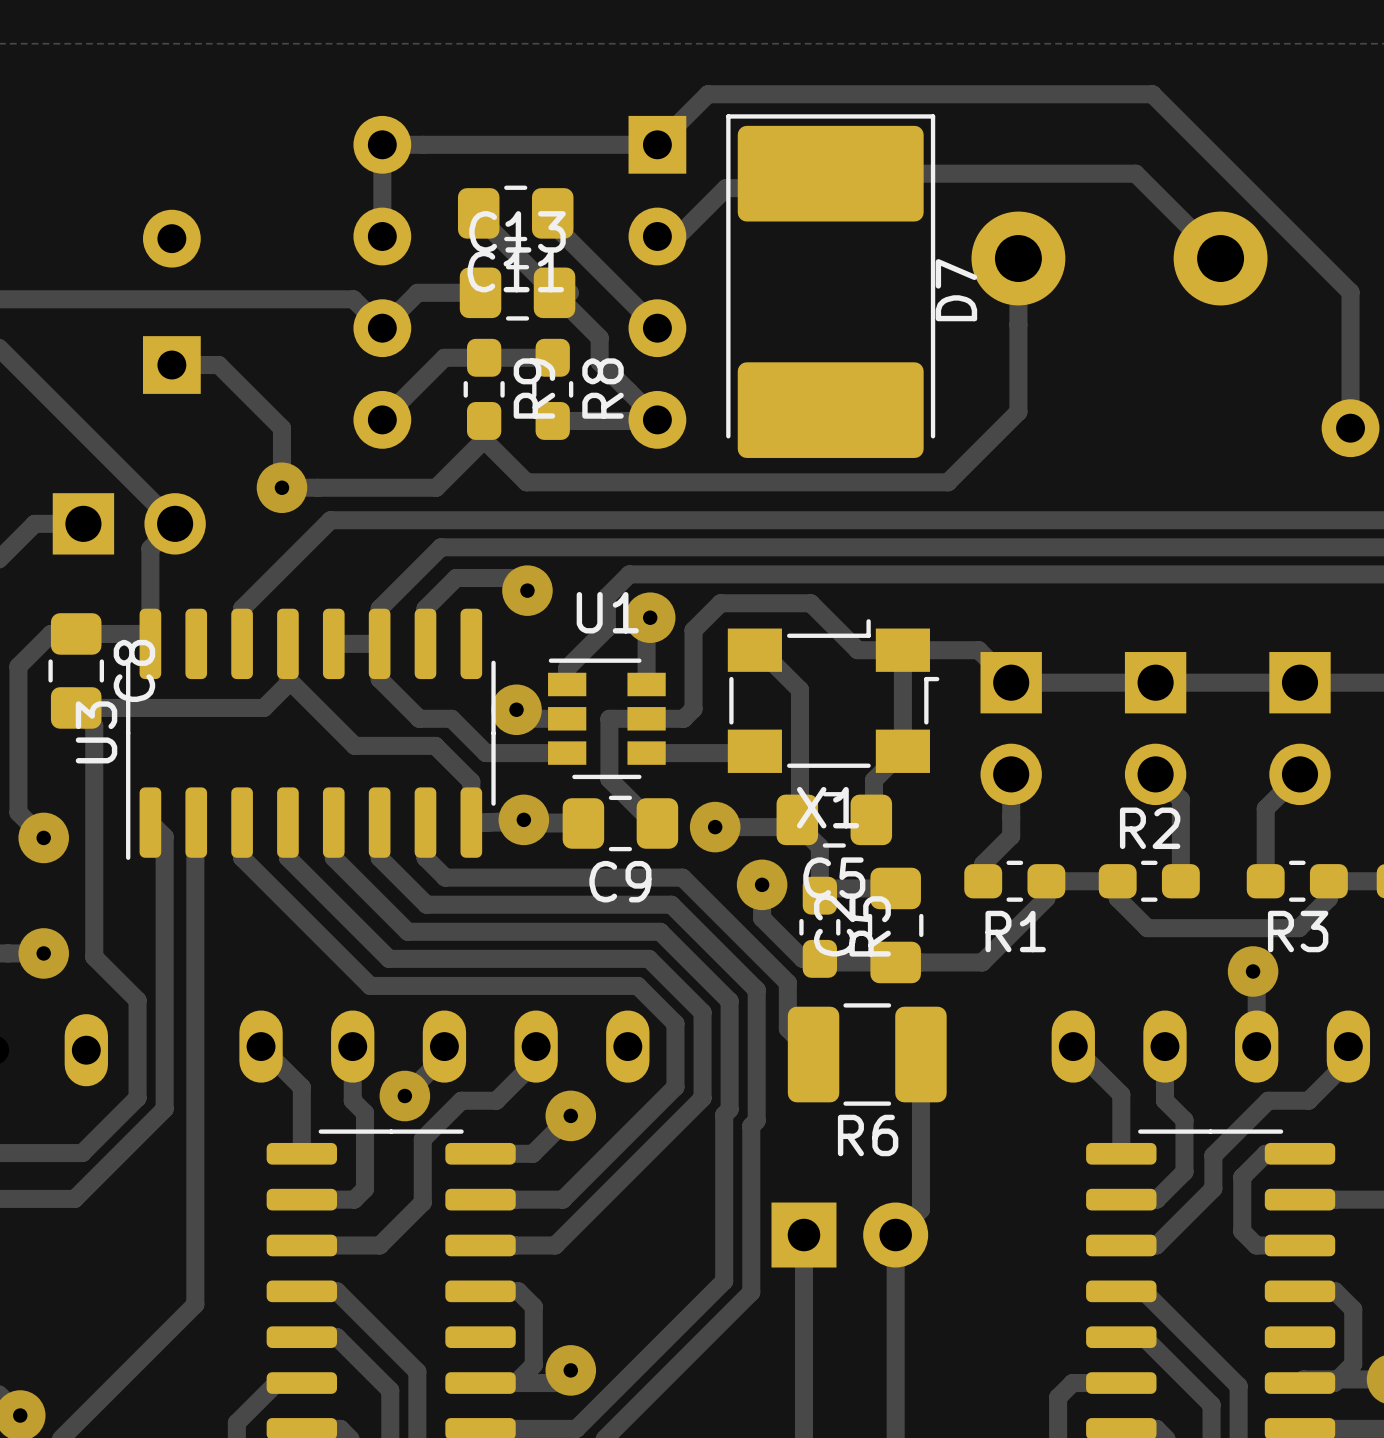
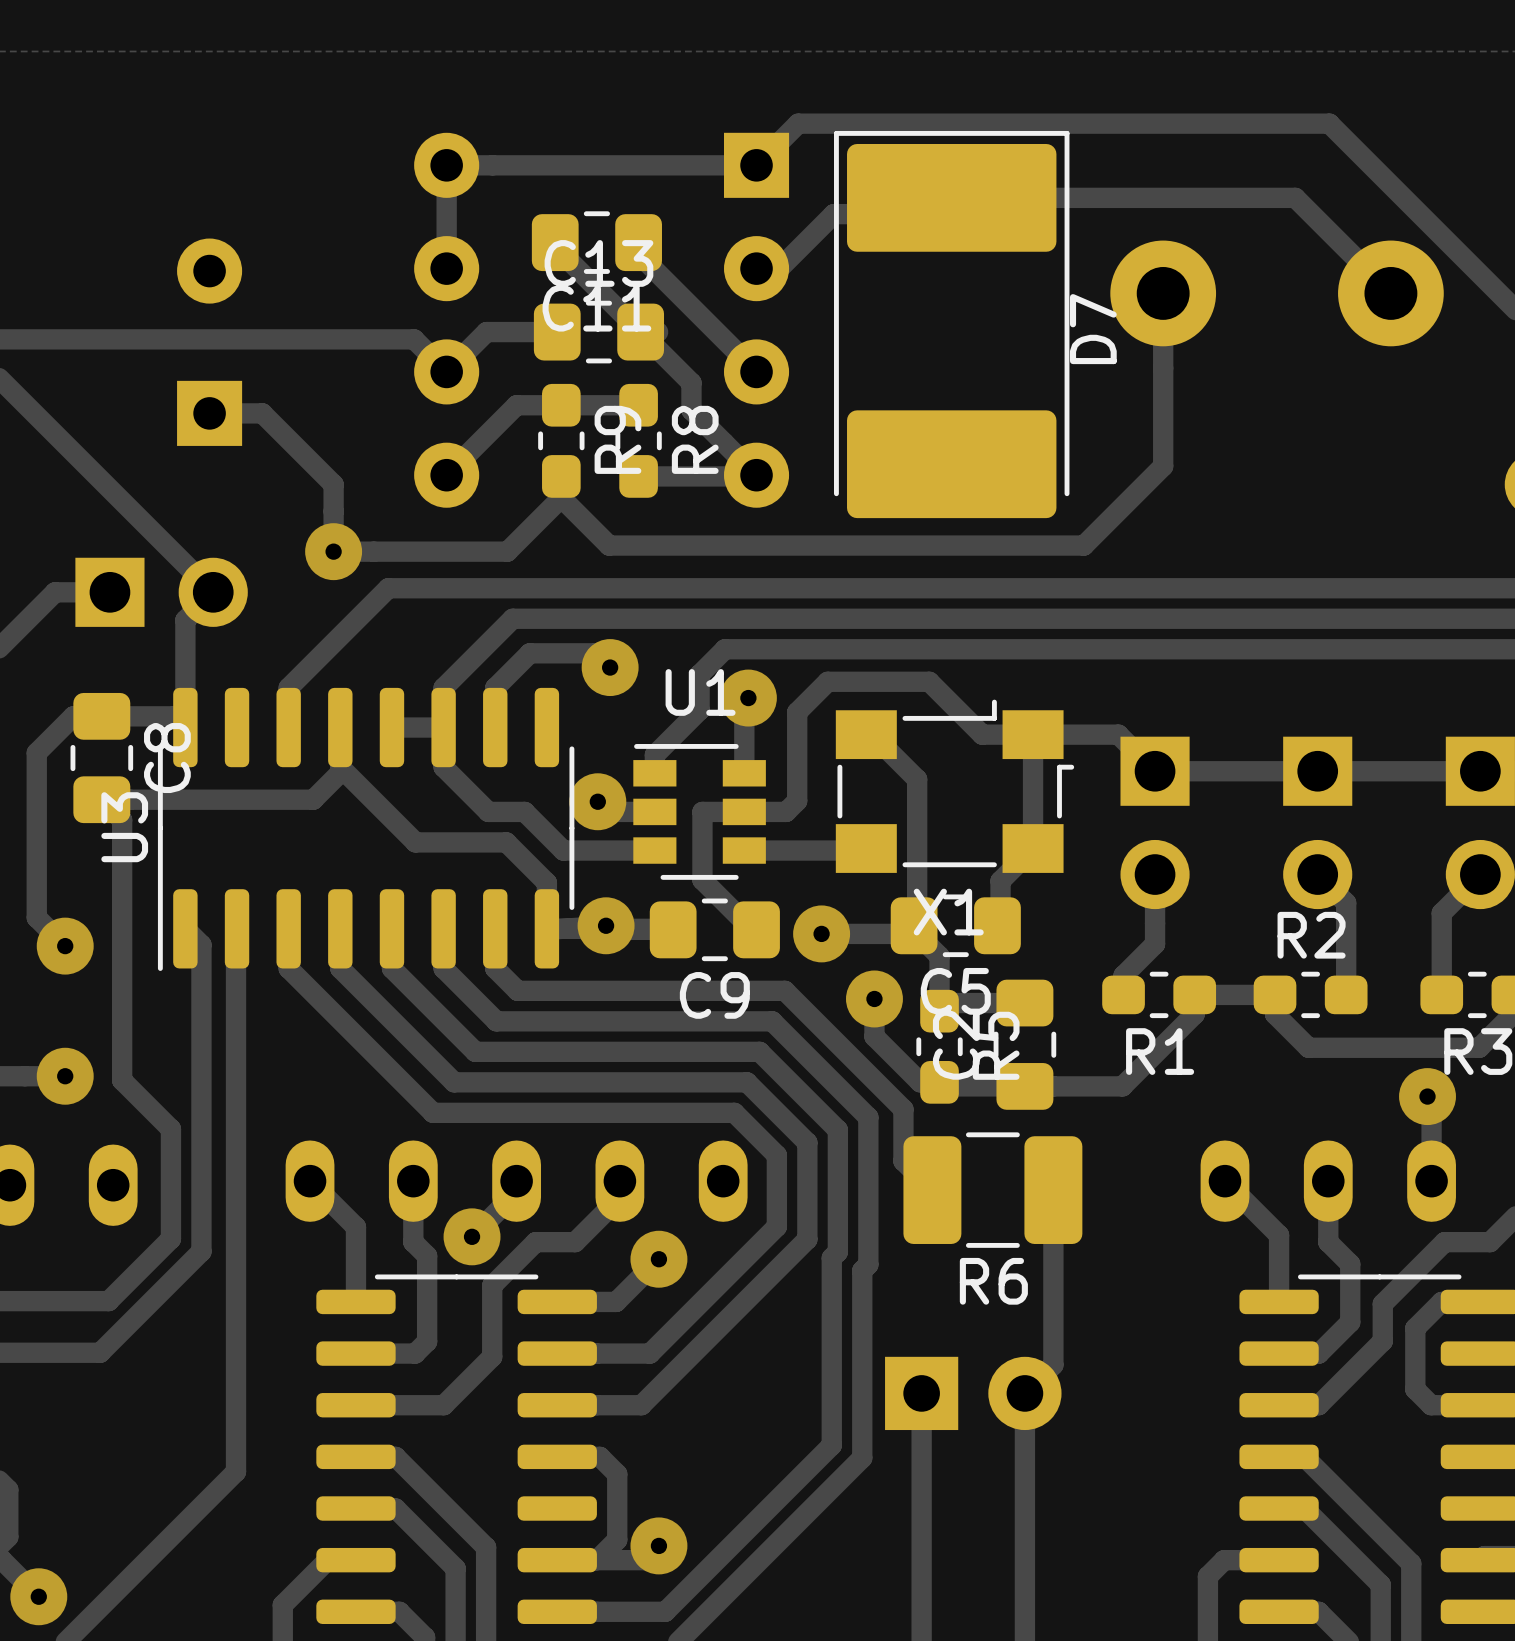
track: (694, 107) (707, 94) (1152, 94) (1166, 107) -> (798, 123) (1329, 123)

